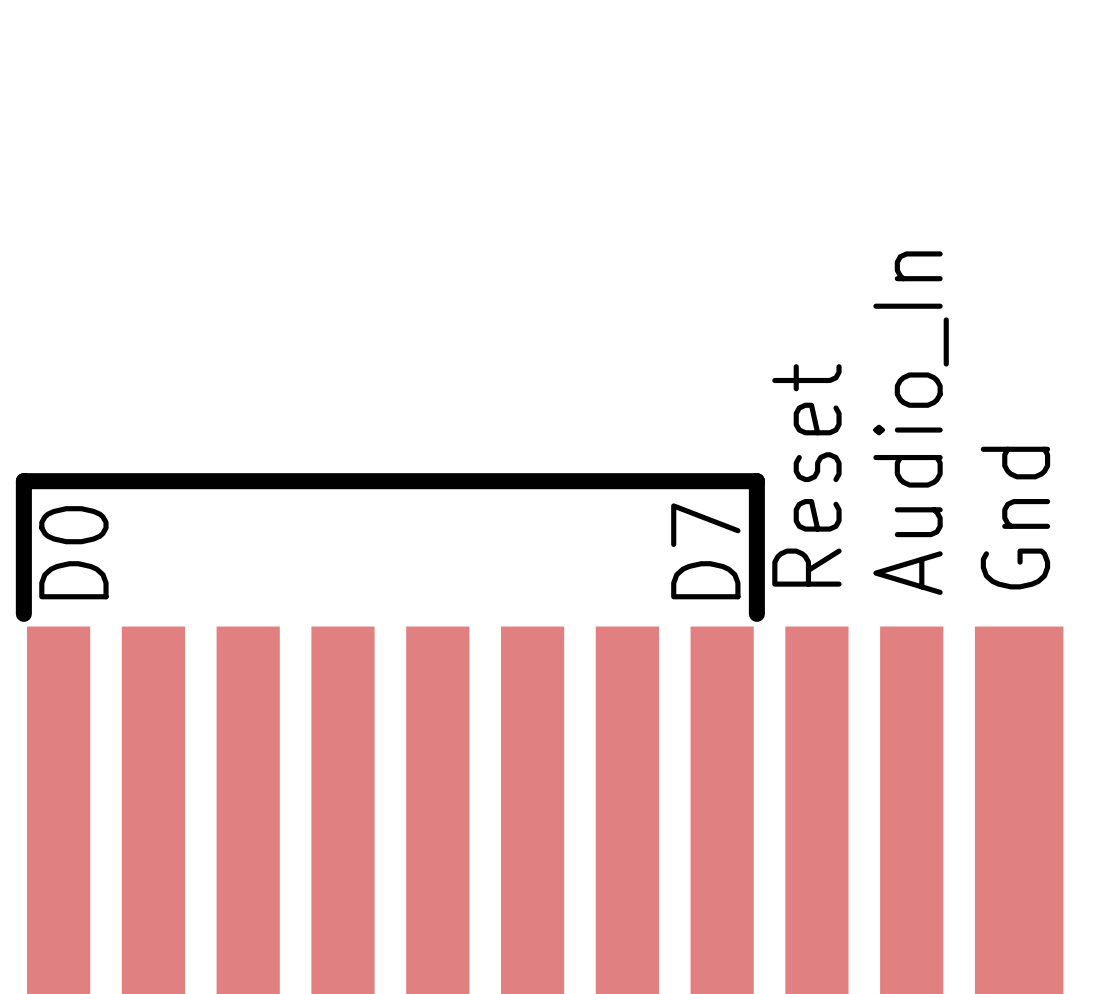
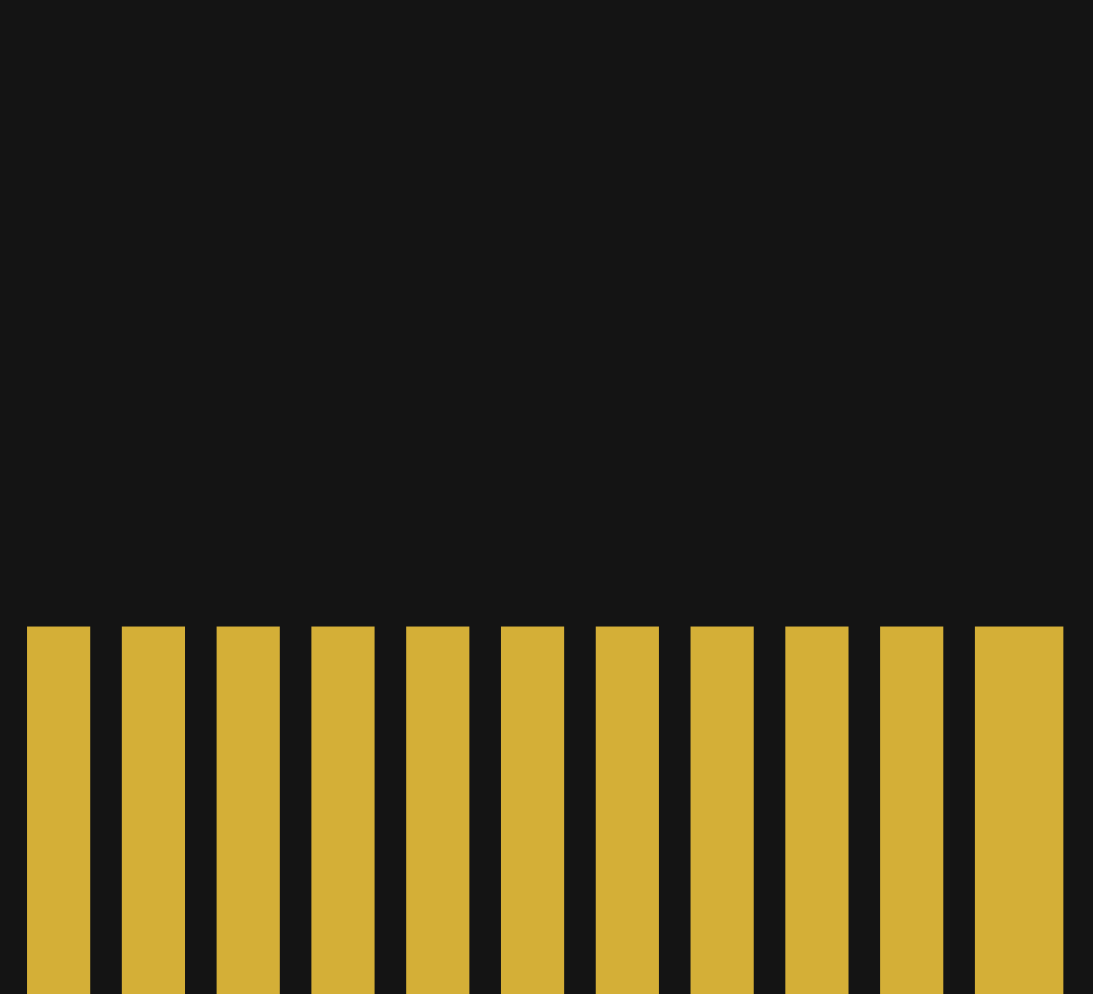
text: Audio_In (911, 423) -> none
text: Reset (806, 475) -> none
text: Gnd (1015, 518) -> none
text: D7 (705, 551) -> none
text: D0 (73, 552) -> none
line: (23, 613) (23, 481) (756, 481) (756, 613) -> none

